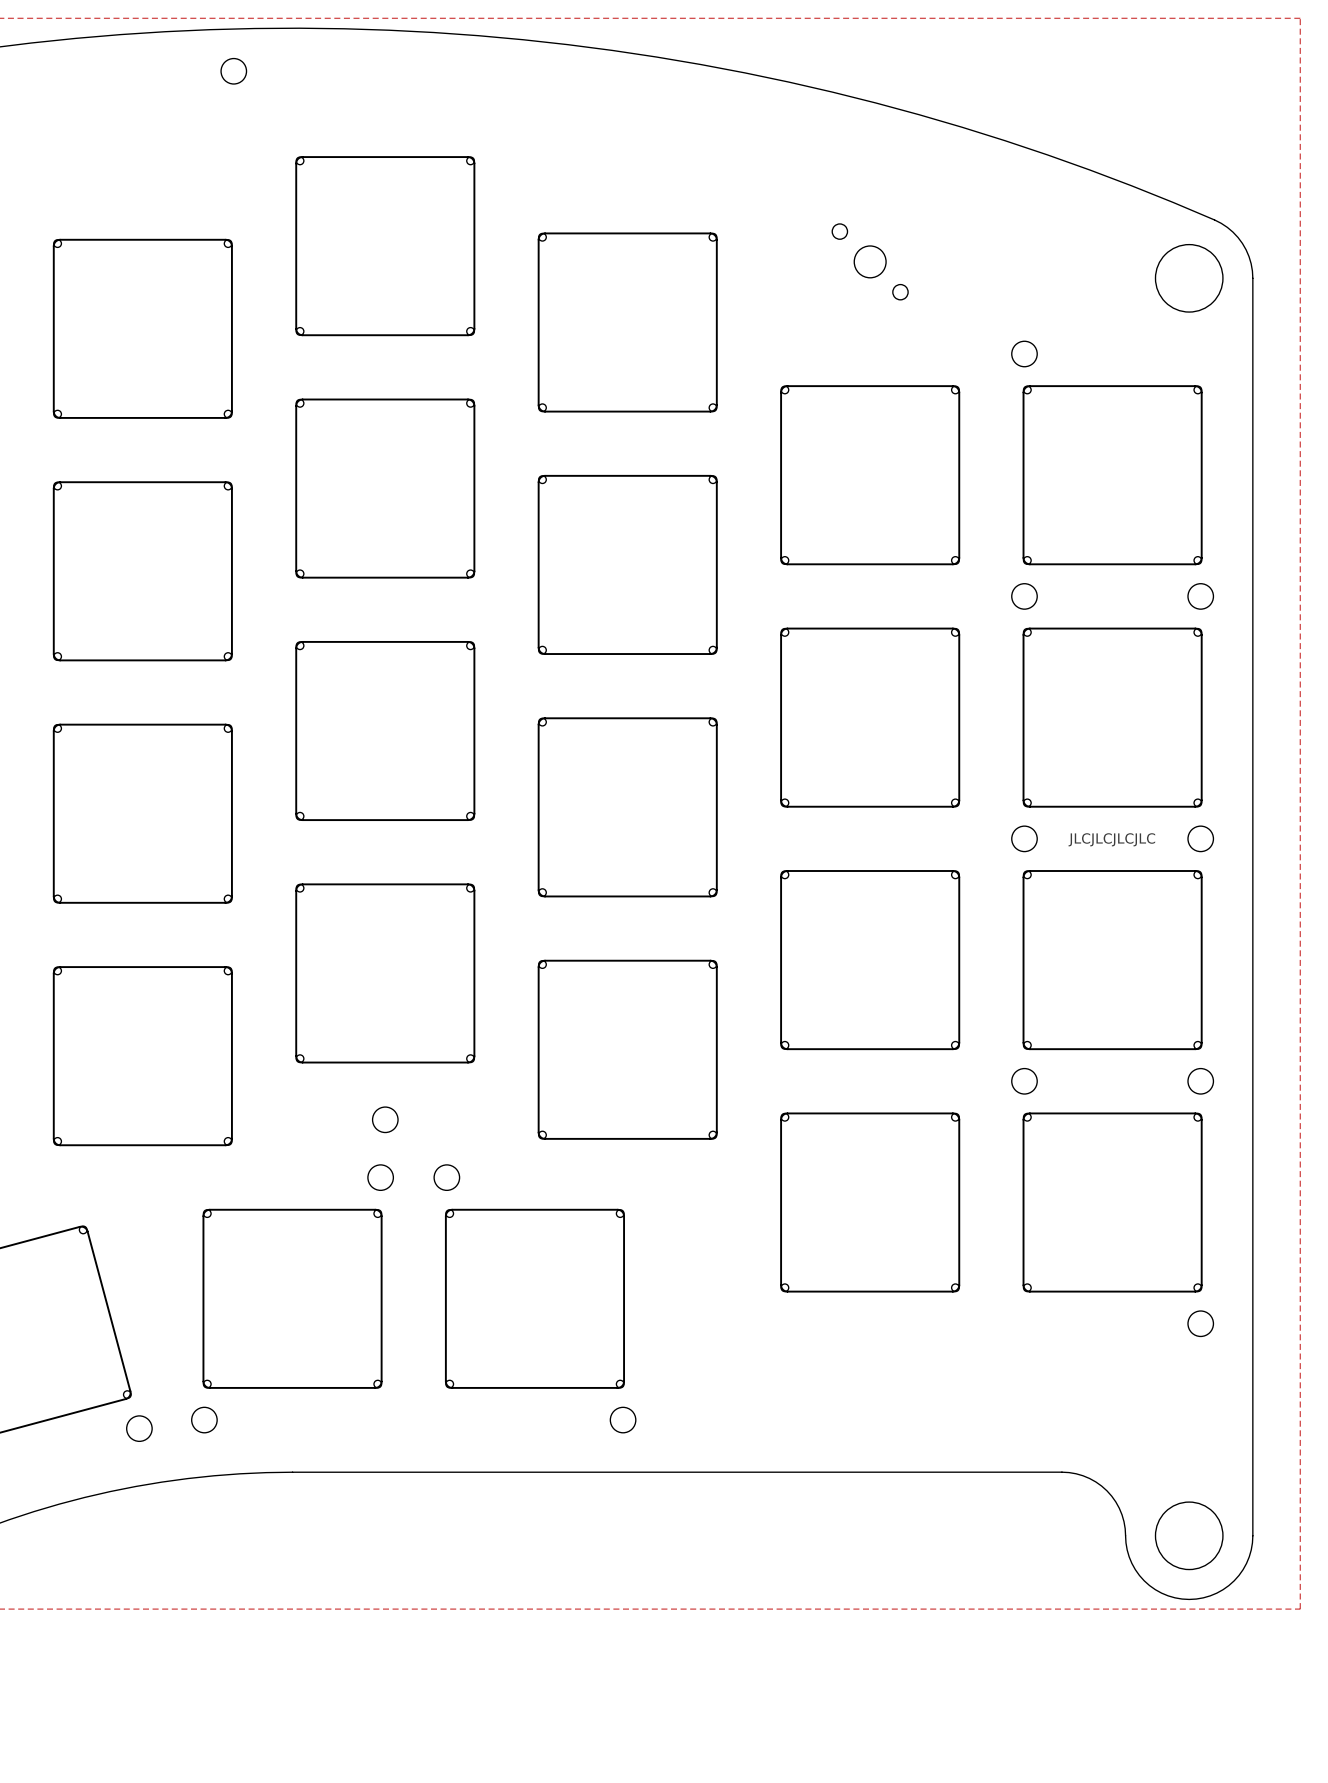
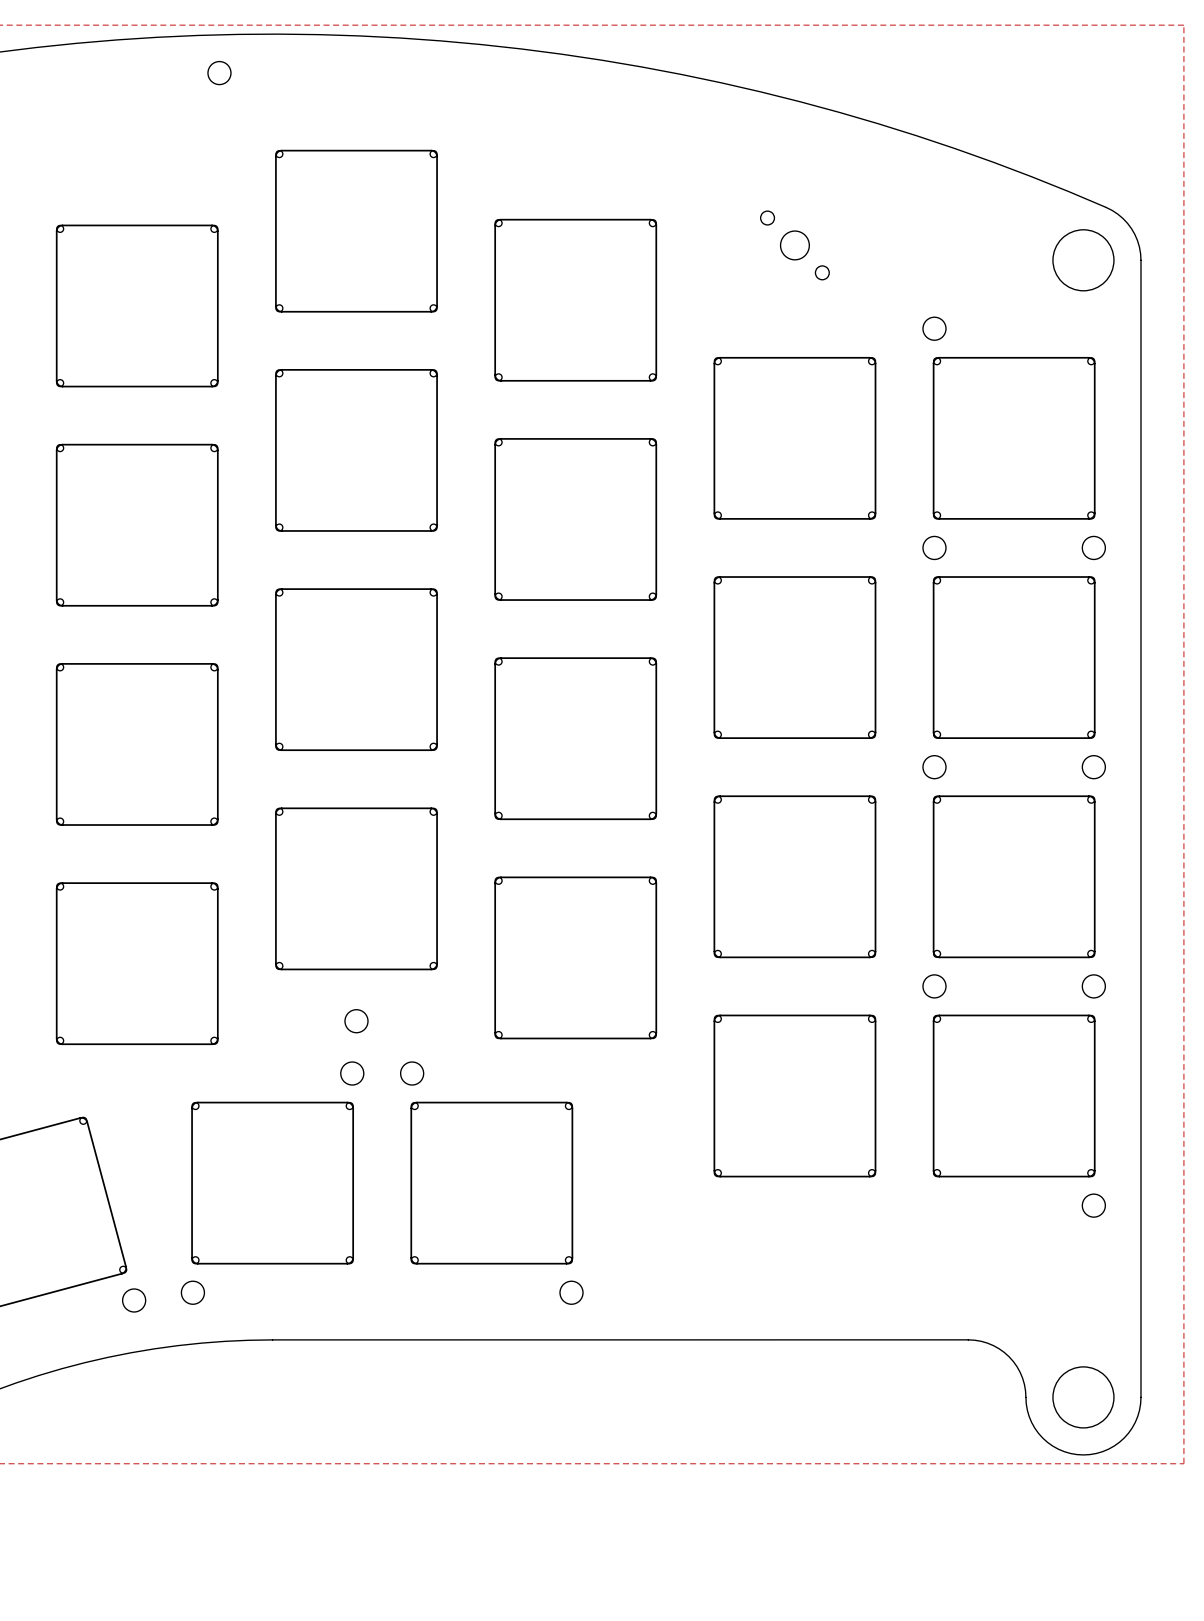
JLCJLCJLCJLC: (1111, 839) -> none

